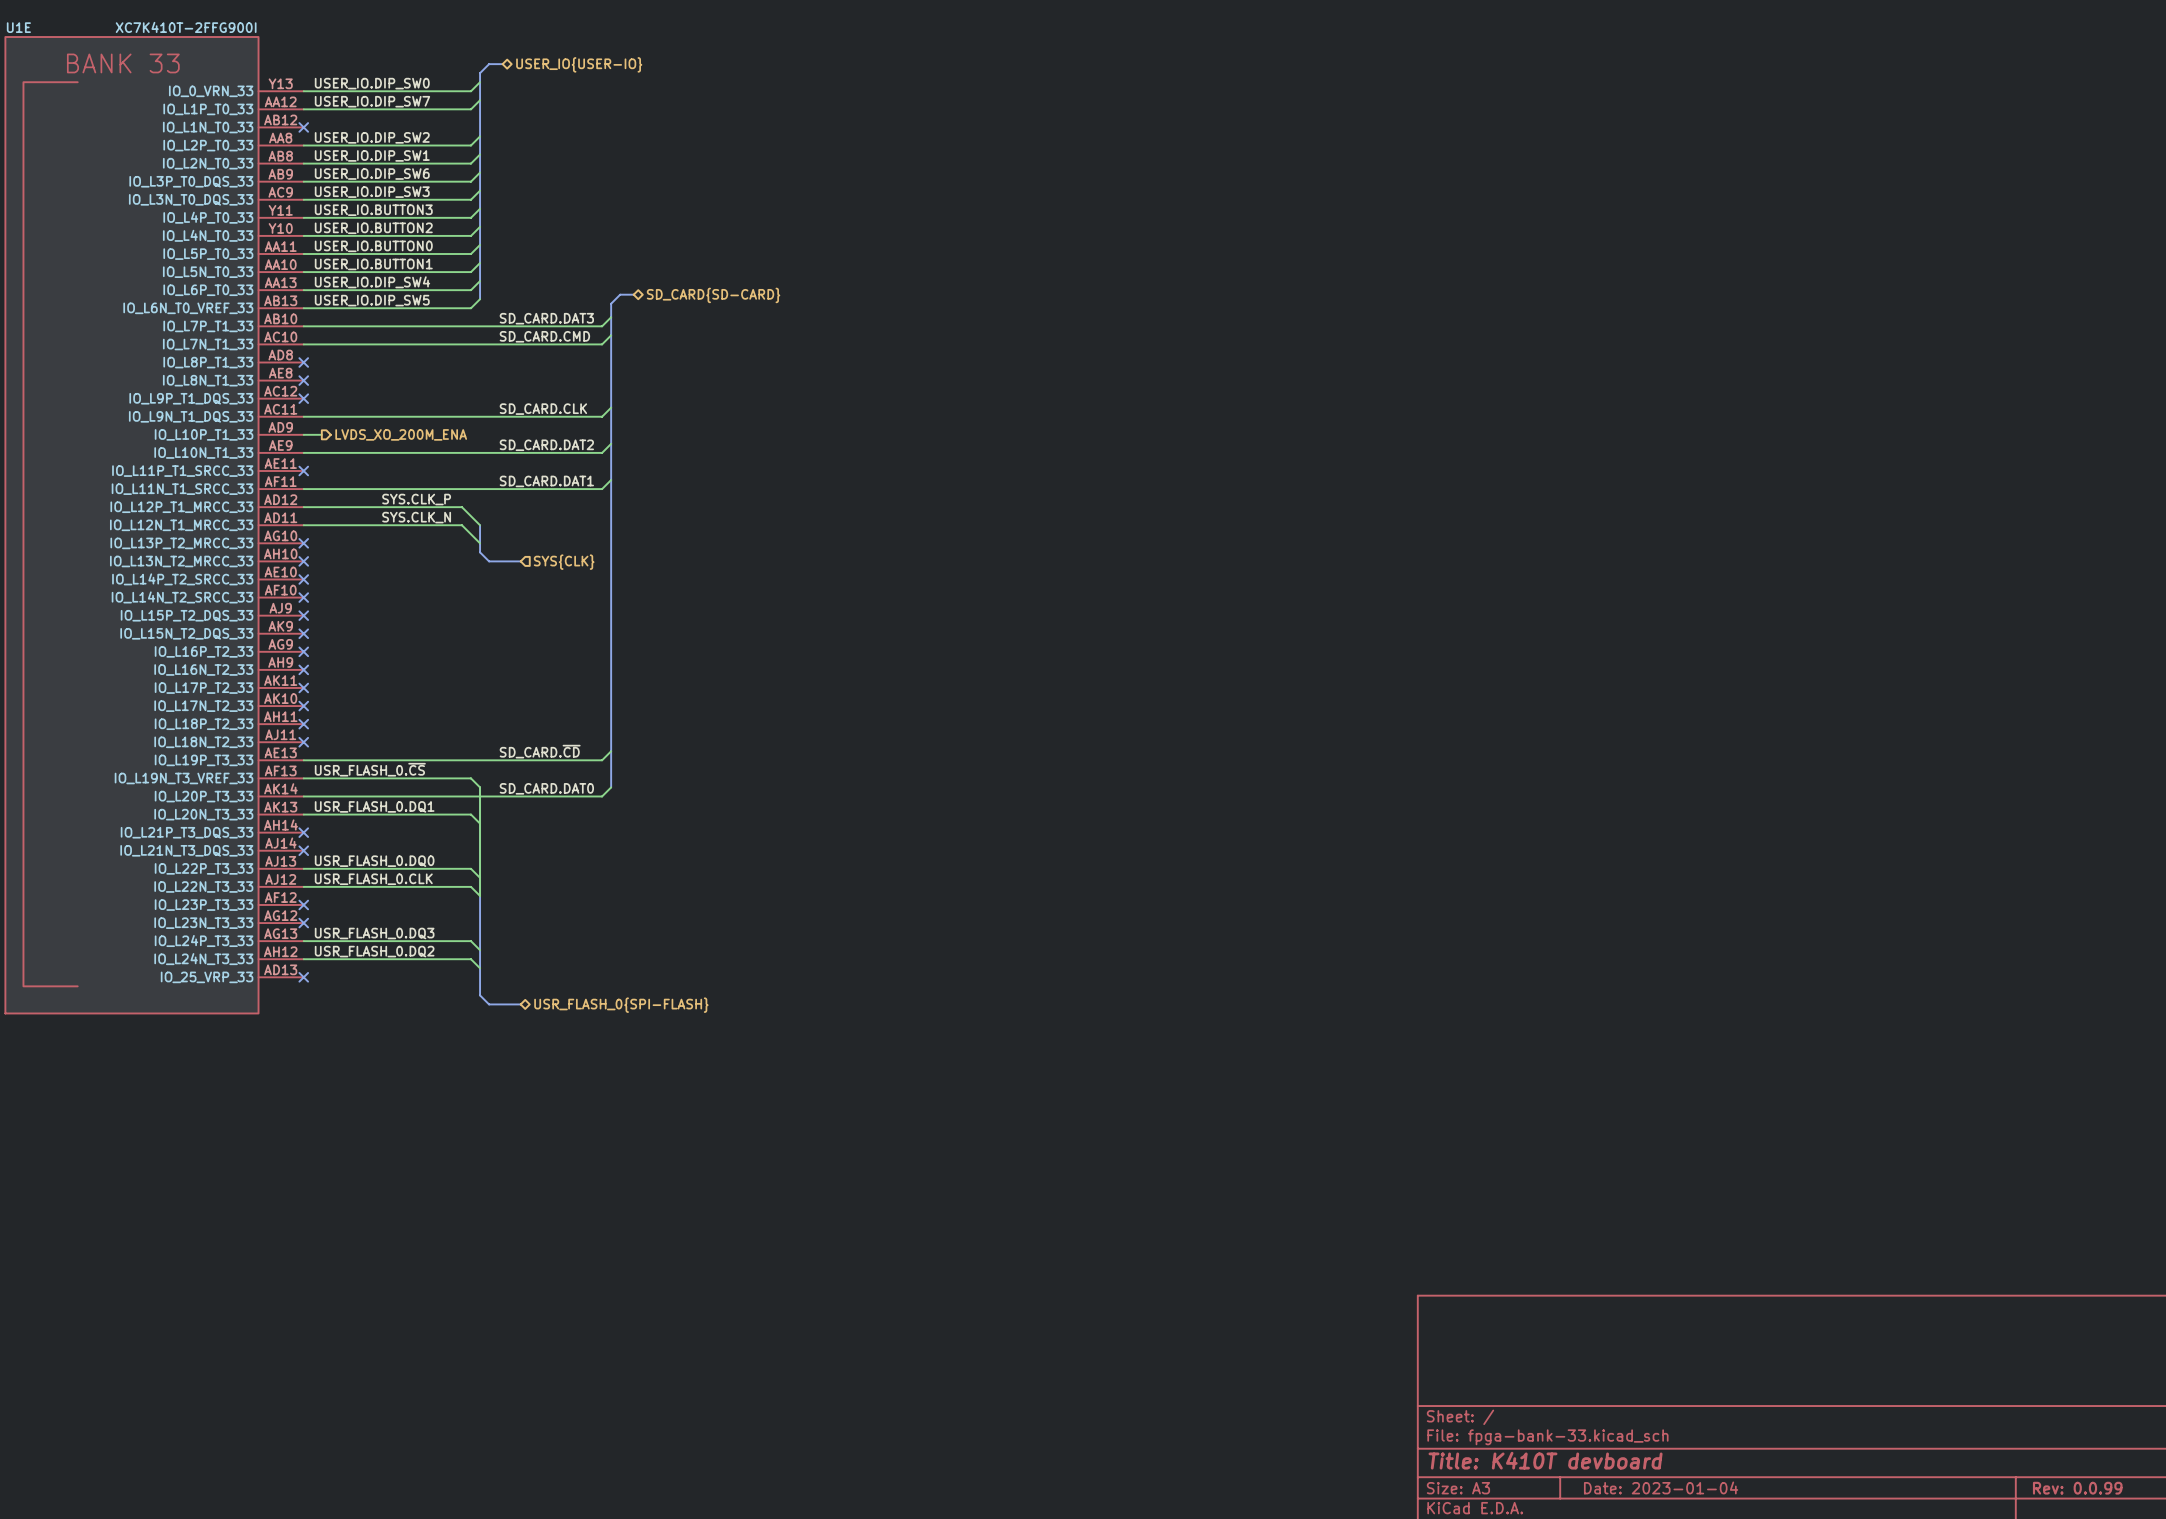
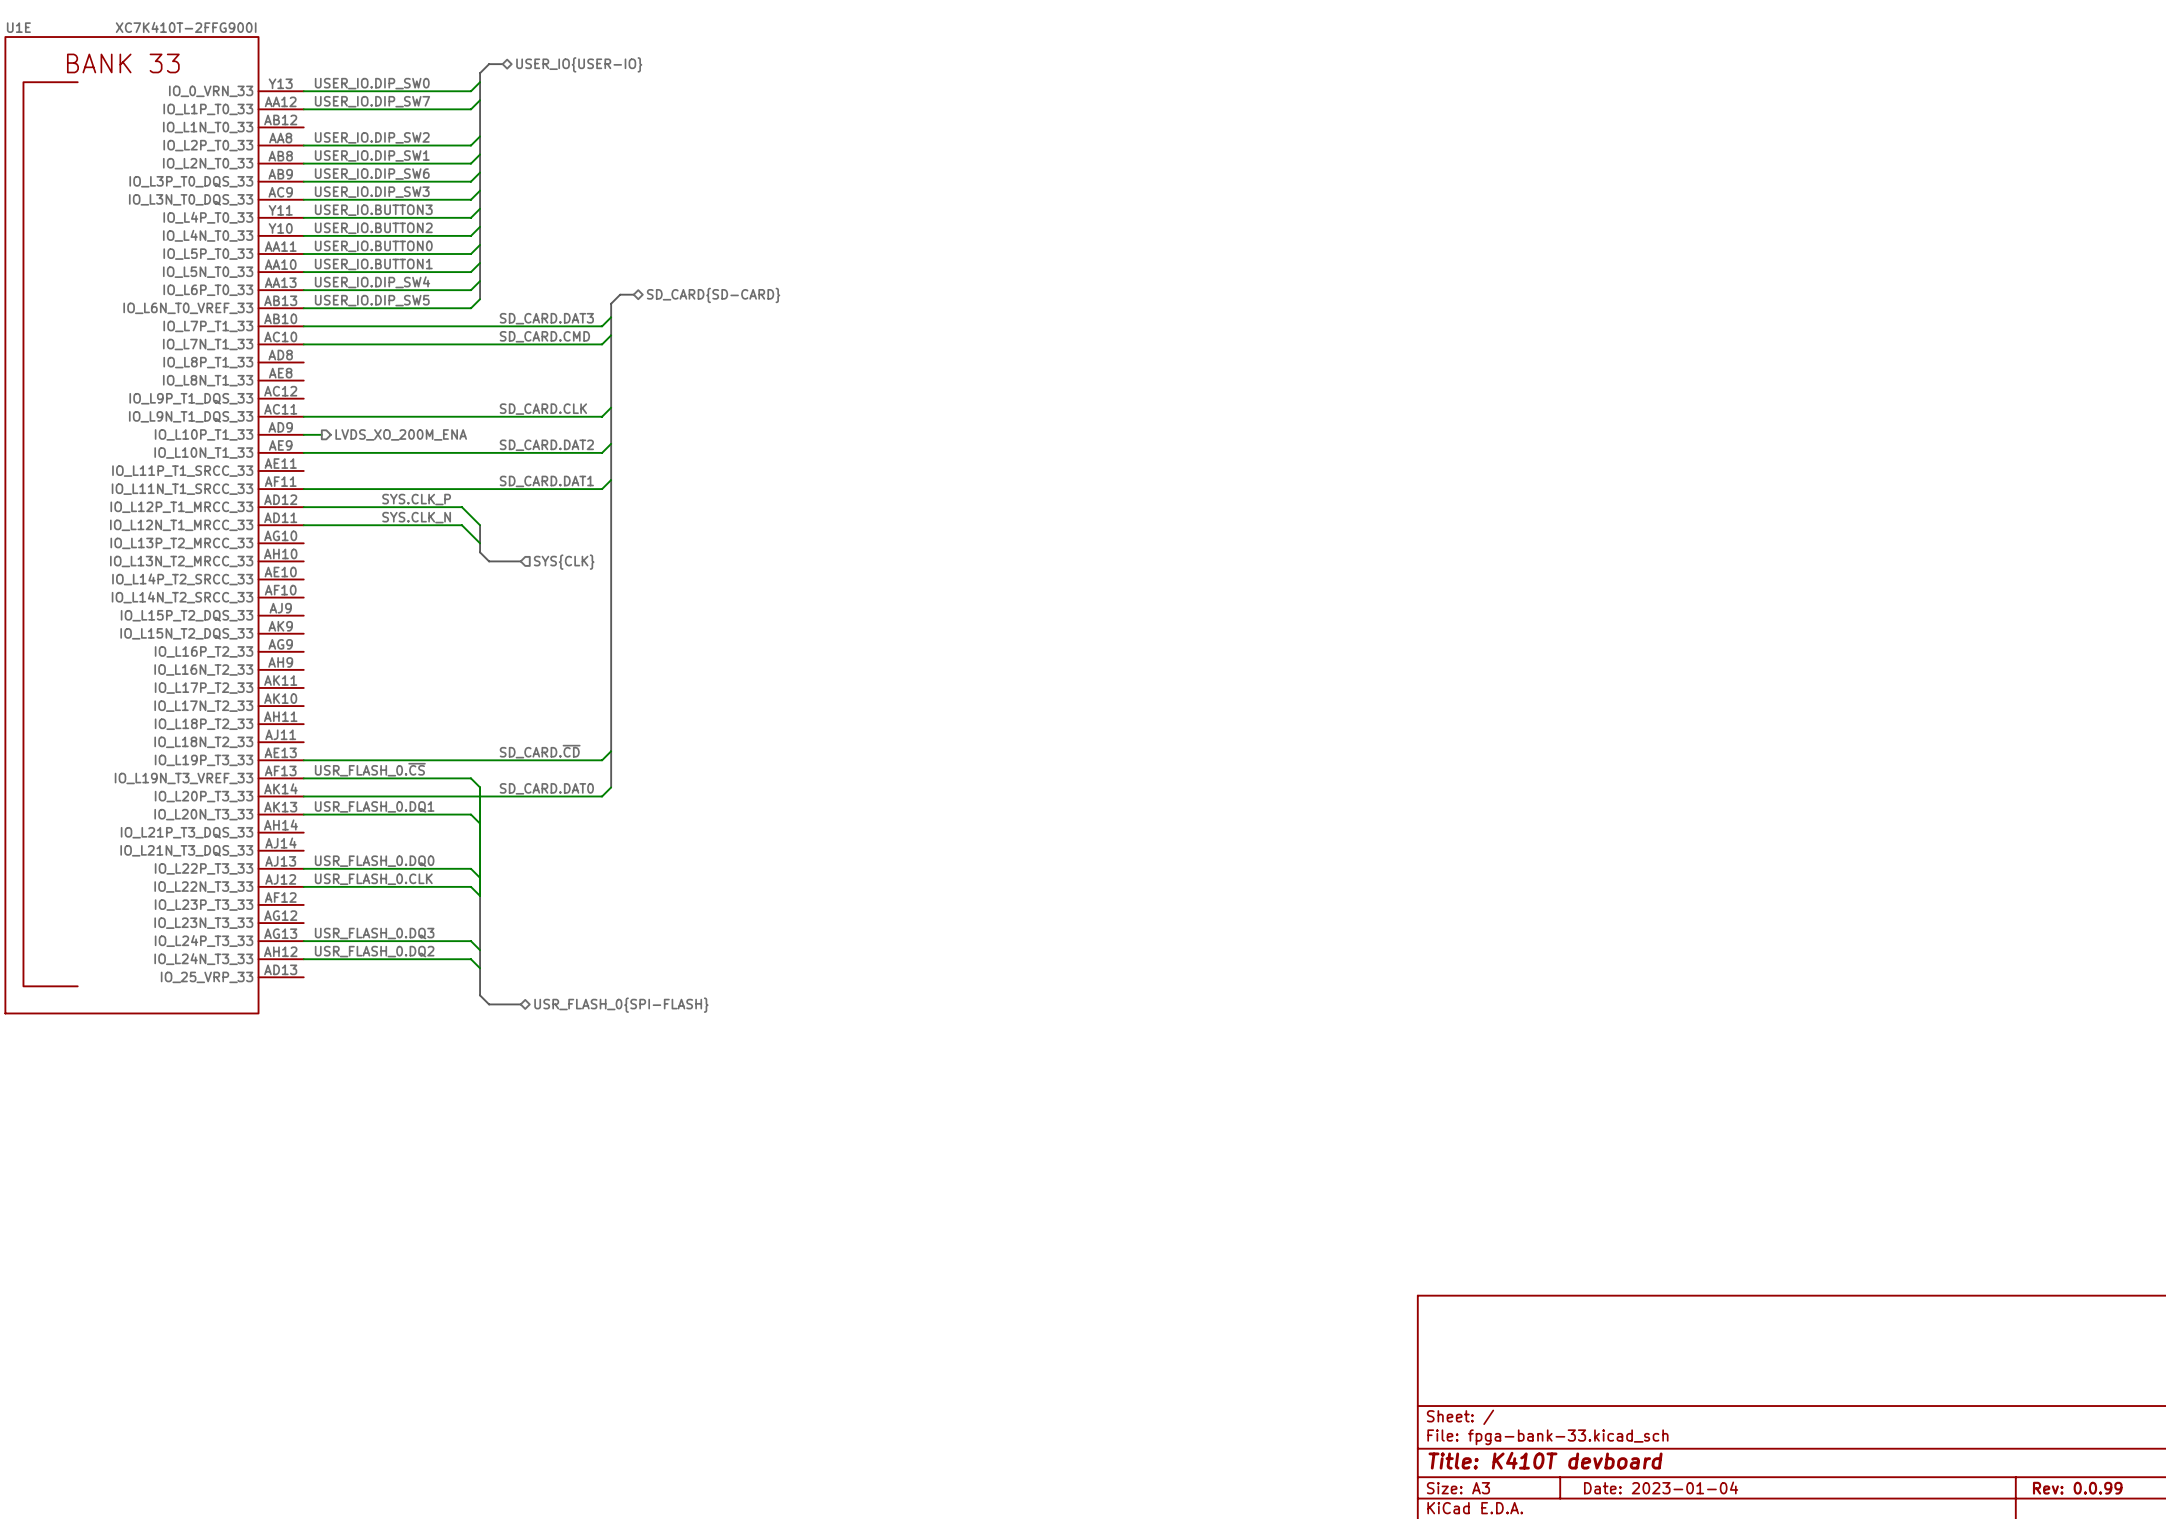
no-connect mark: (303, 127) -> none
no-connect mark: (303, 362) -> none
no-connect mark: (303, 380) -> none
no-connect mark: (303, 398) -> none
no-connect mark: (303, 470) -> none
no-connect mark: (303, 543) -> none
no-connect mark: (303, 561) -> none
no-connect mark: (303, 579) -> none
no-connect mark: (303, 597) -> none
no-connect mark: (303, 615) -> none
no-connect mark: (303, 633) -> none
no-connect mark: (303, 651) -> none
no-connect mark: (303, 669) -> none
no-connect mark: (303, 687) -> none
no-connect mark: (303, 706) -> none
no-connect mark: (303, 724) -> none
no-connect mark: (303, 742) -> none
no-connect mark: (303, 832) -> none
no-connect mark: (303, 850) -> none
no-connect mark: (303, 904) -> none
no-connect mark: (303, 923) -> none
no-connect mark: (303, 977) -> none

